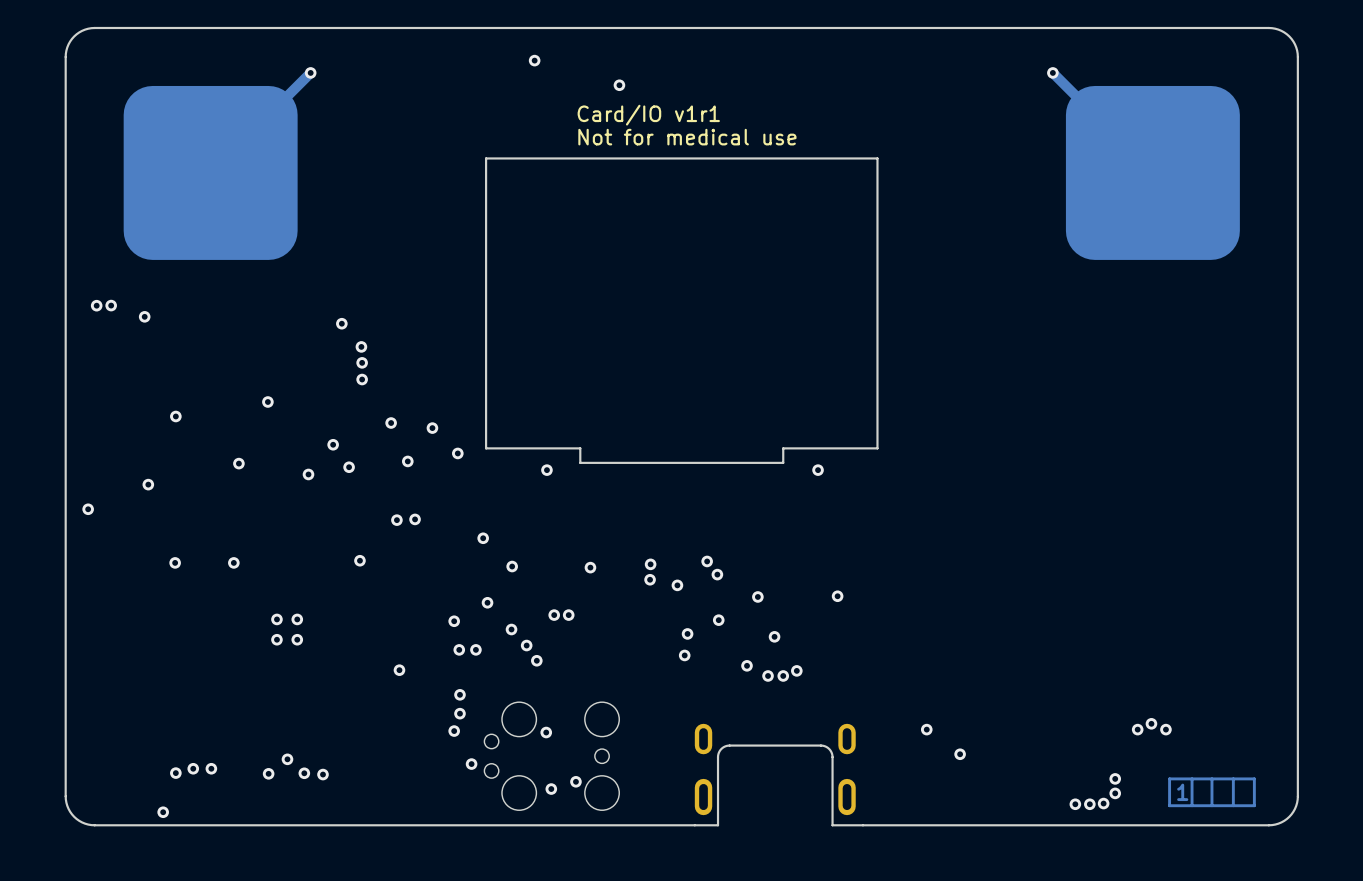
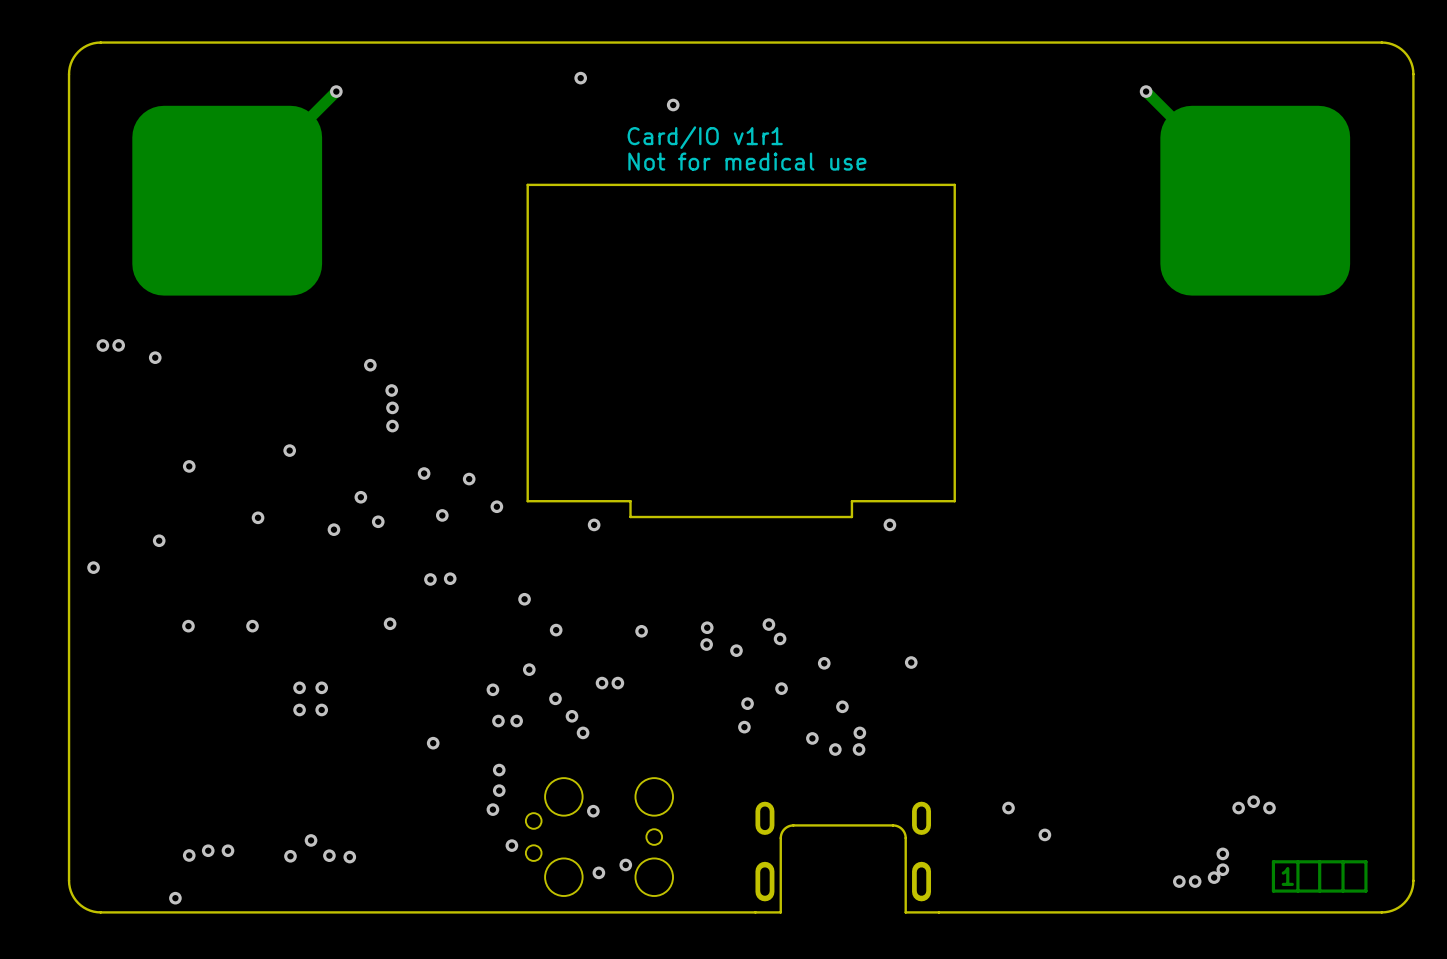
via: none -> (859, 732)
via: (796, 670) -> none
via: (783, 675) -> none
via: none -> (859, 749)
via: none -> (1222, 853)
via: (1115, 778) -> none
via: none -> (1222, 869)
via: none -> (1179, 881)
via: none -> (1195, 881)
via: (1103, 803) -> none
via: (1075, 804) -> none
via: (1089, 804) -> none

